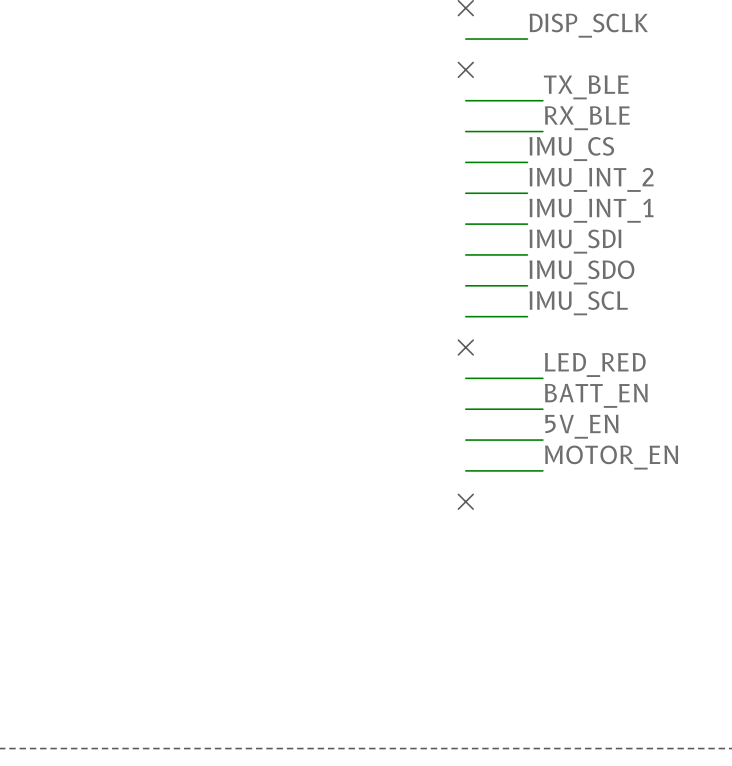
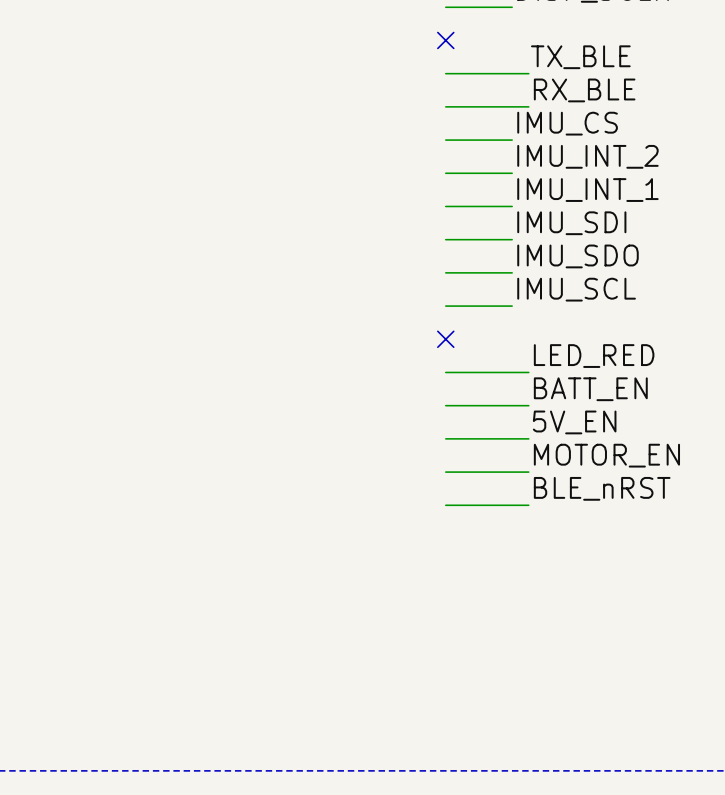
label: none -> BLE_nRST (602, 488)
wire: none -> (445, 505) (528, 505)
no-connect mark: (465, 501) -> none

